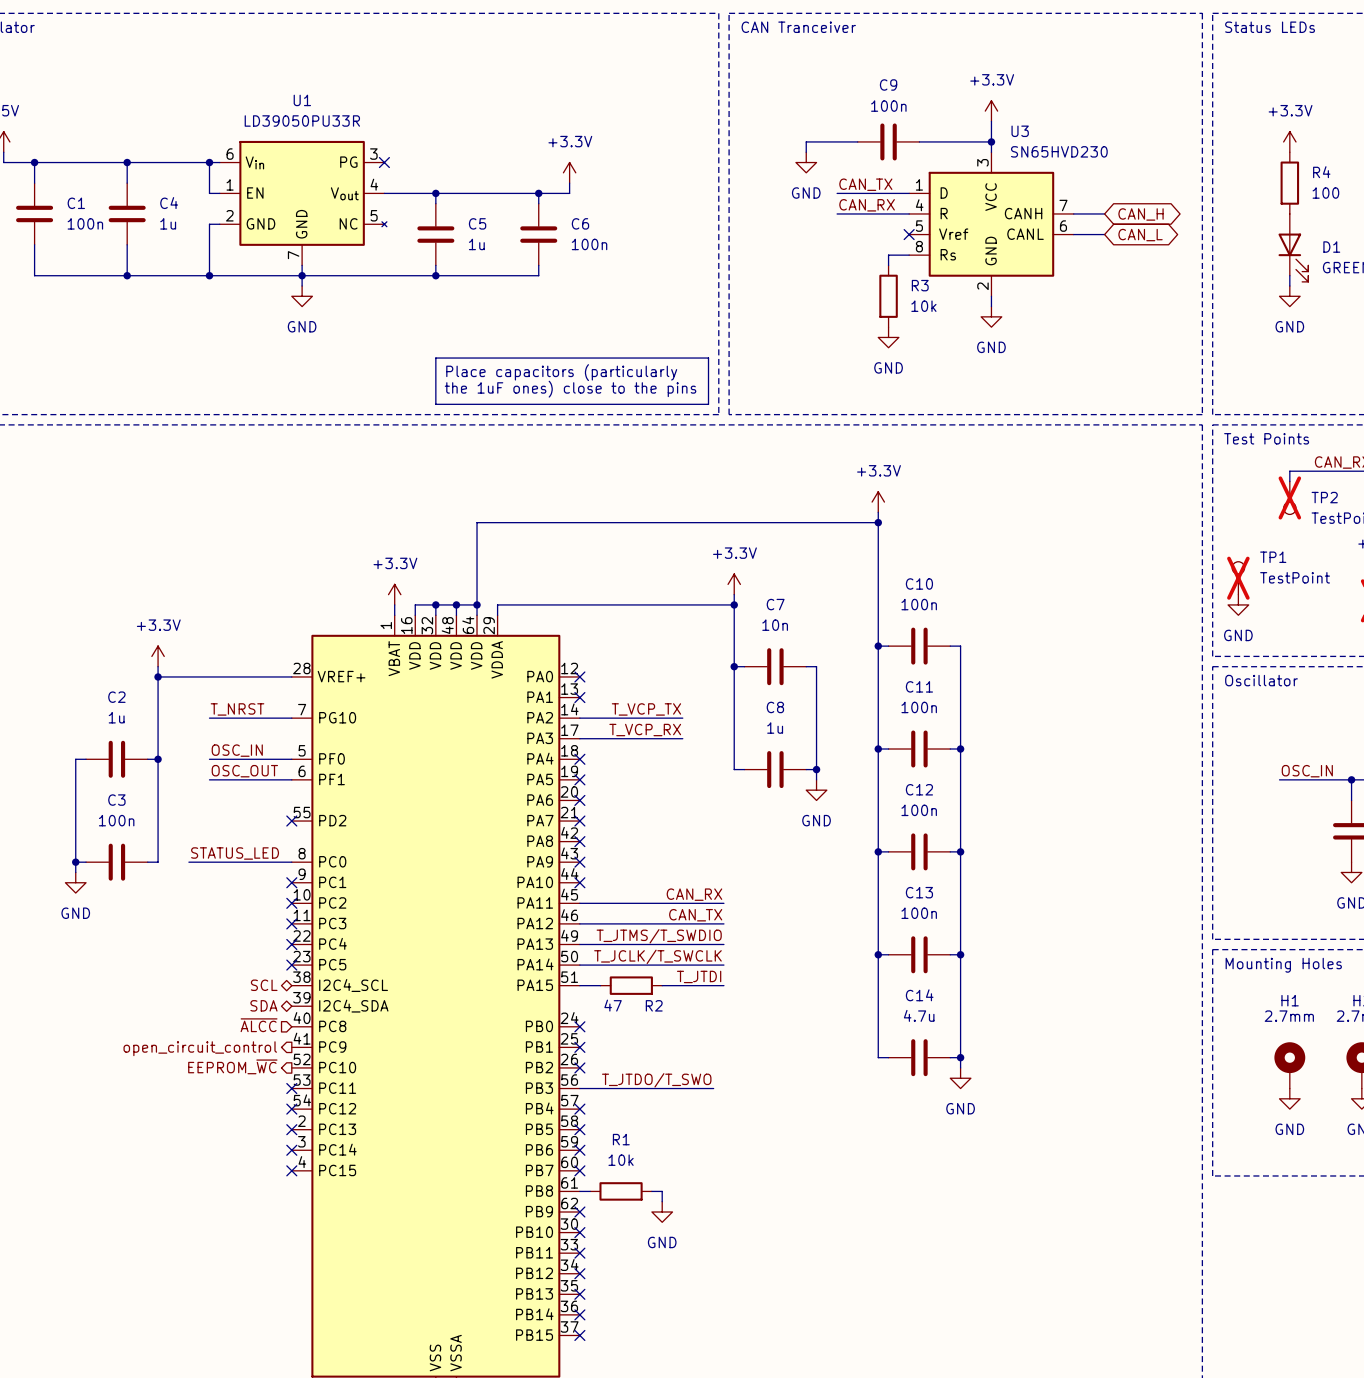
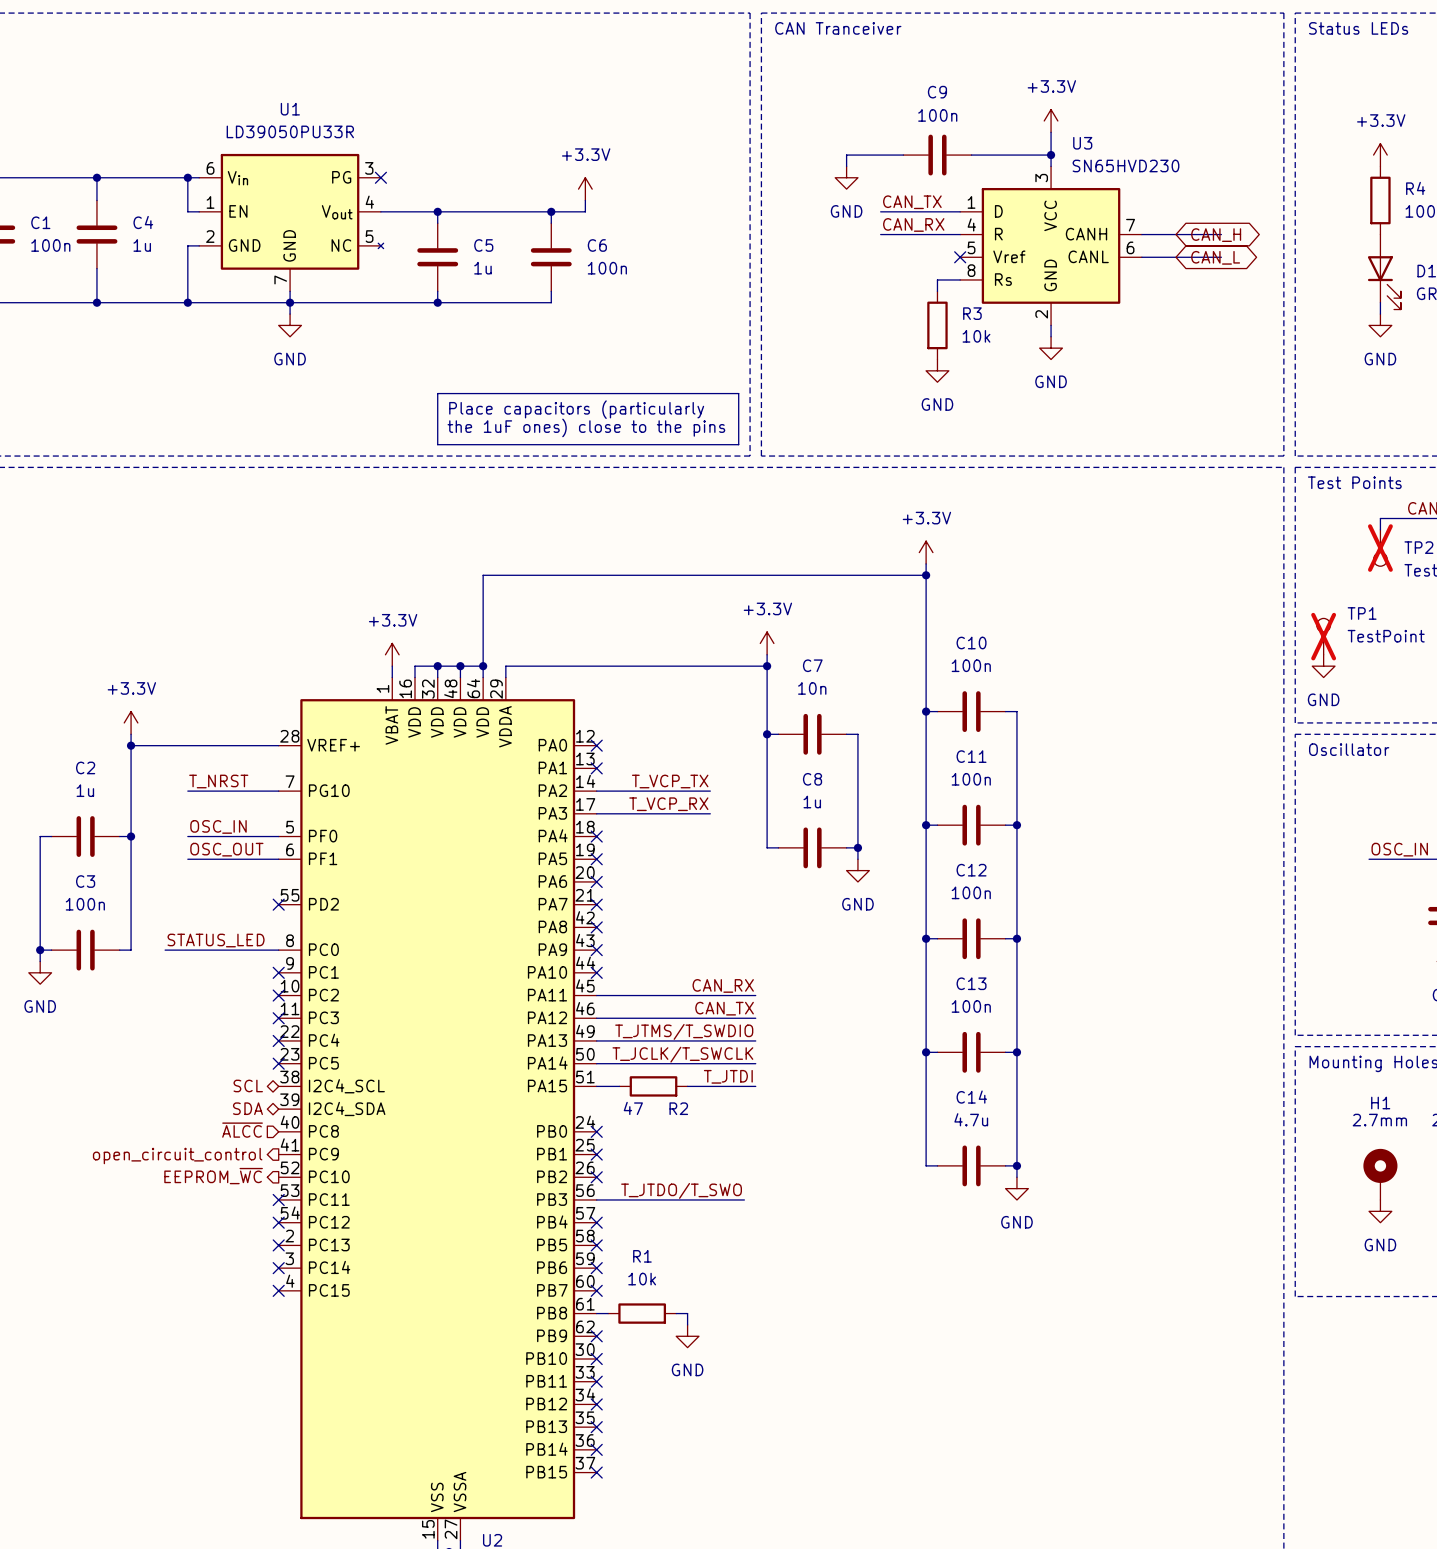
wire: none -> (1175, 234) (1221, 234)
wire: none -> (1175, 257) (1221, 257)

